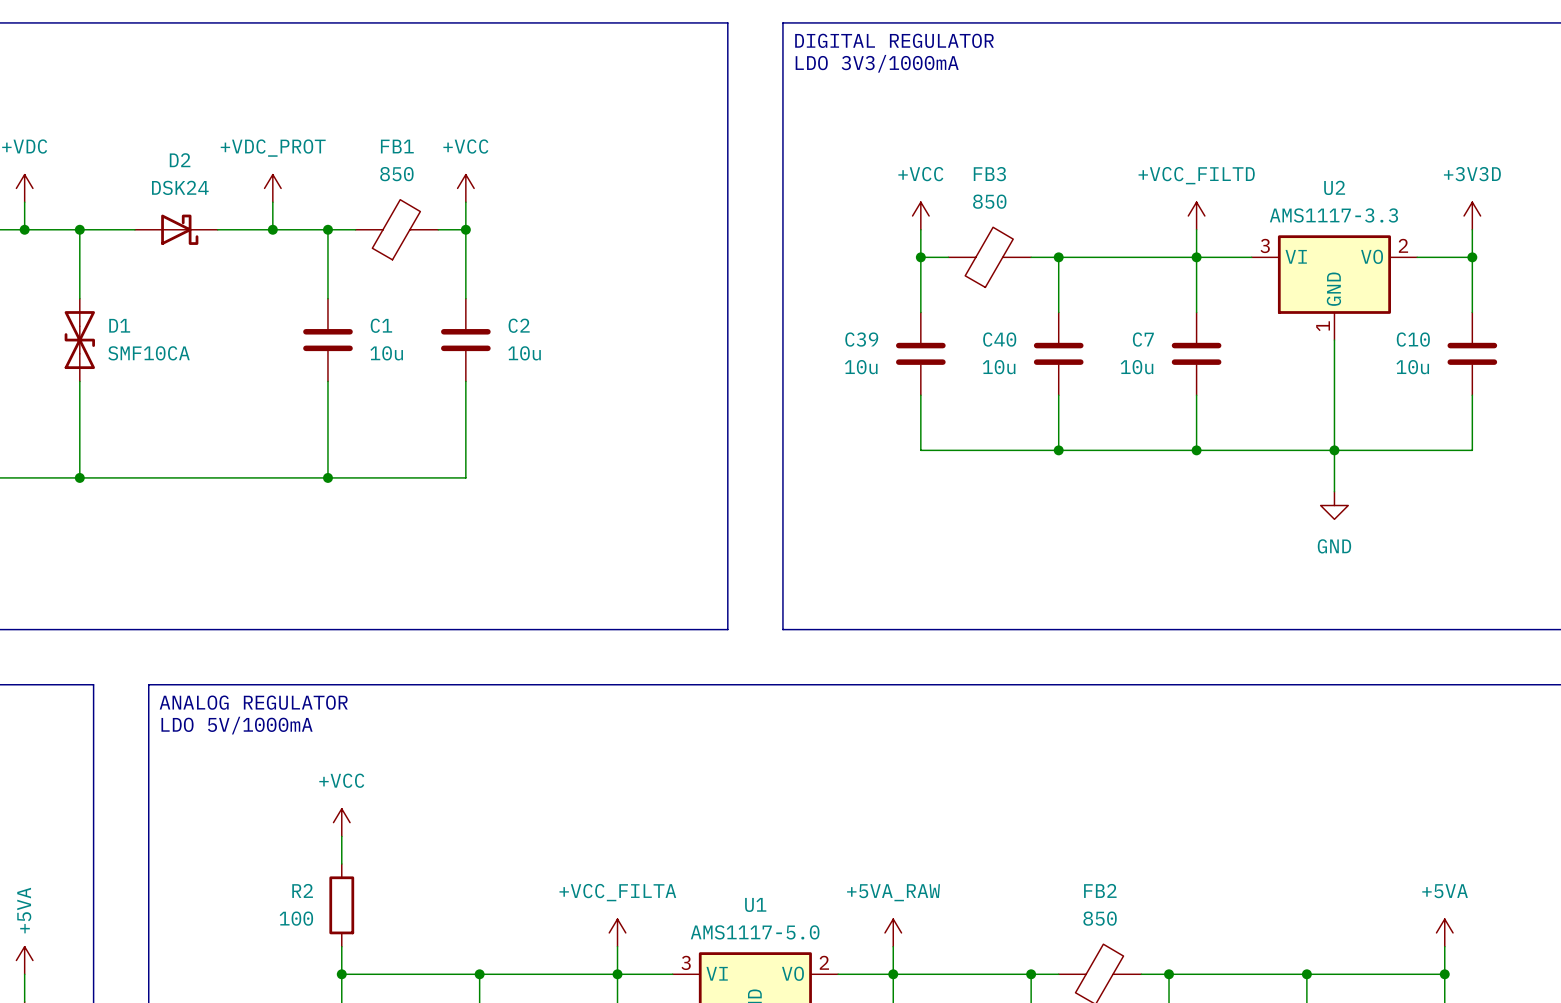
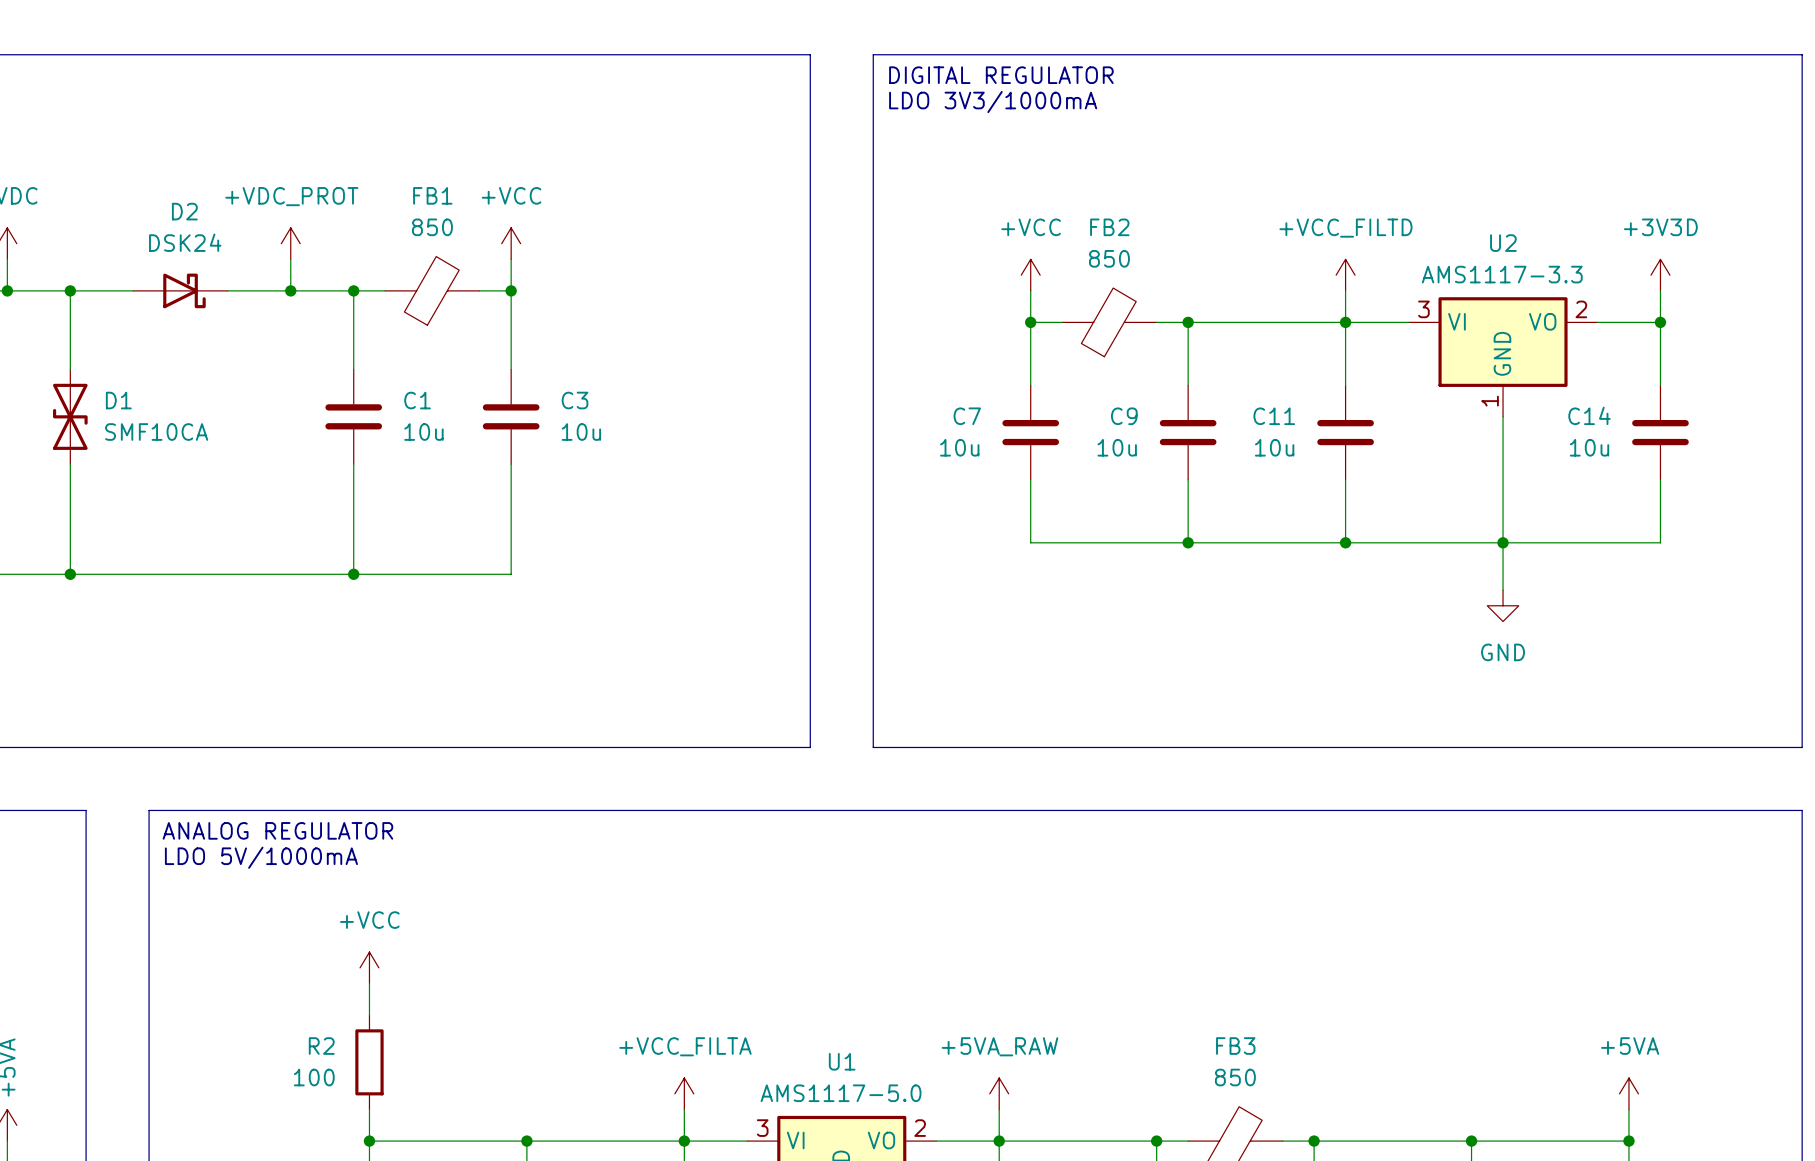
FB3 name: FB3 (989, 174) -> FB2 (1109, 227)
C2 name: C2 (519, 325) -> C3 (575, 400)
C39 name: C39 (861, 339) -> C7 (967, 416)
C40 name: C40 (999, 339) -> C9 (1124, 416)
C7 name: C7 (1143, 339) -> C11 (1274, 416)
C10 name: C10 (1413, 339) -> C14 (1589, 415)
FB2 name: FB2 (1100, 890) -> FB3 (1235, 1046)

